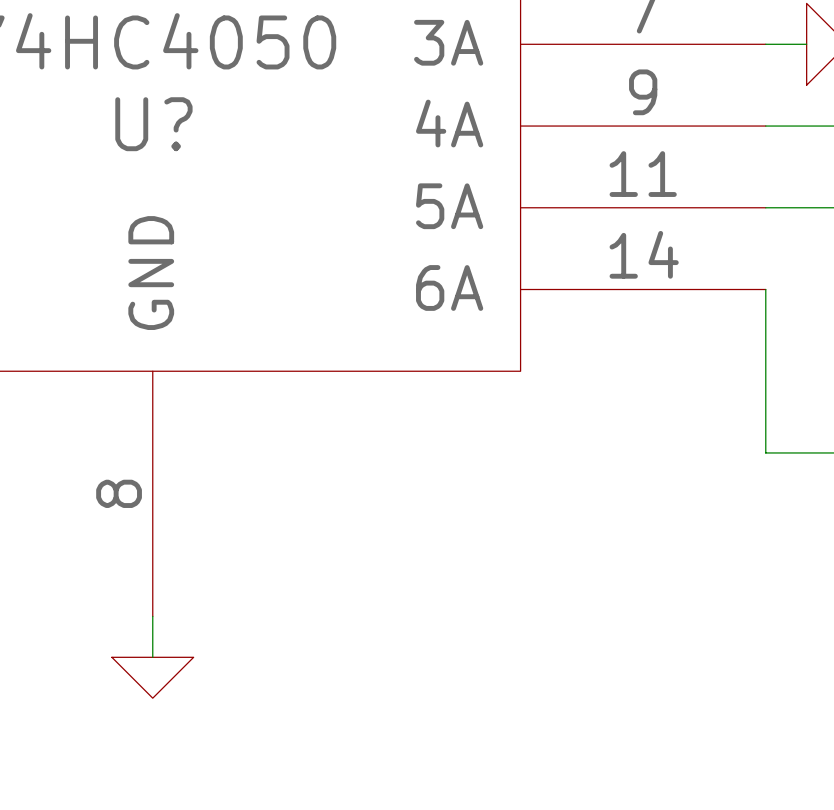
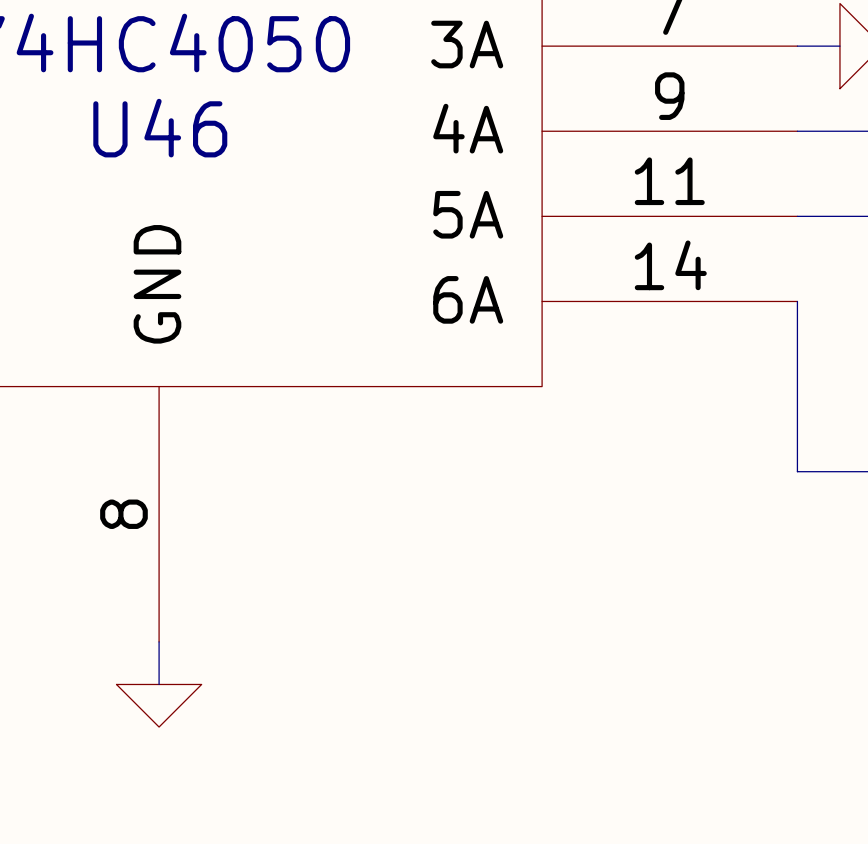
U? name: U? (153, 124) -> U46 (160, 128)

